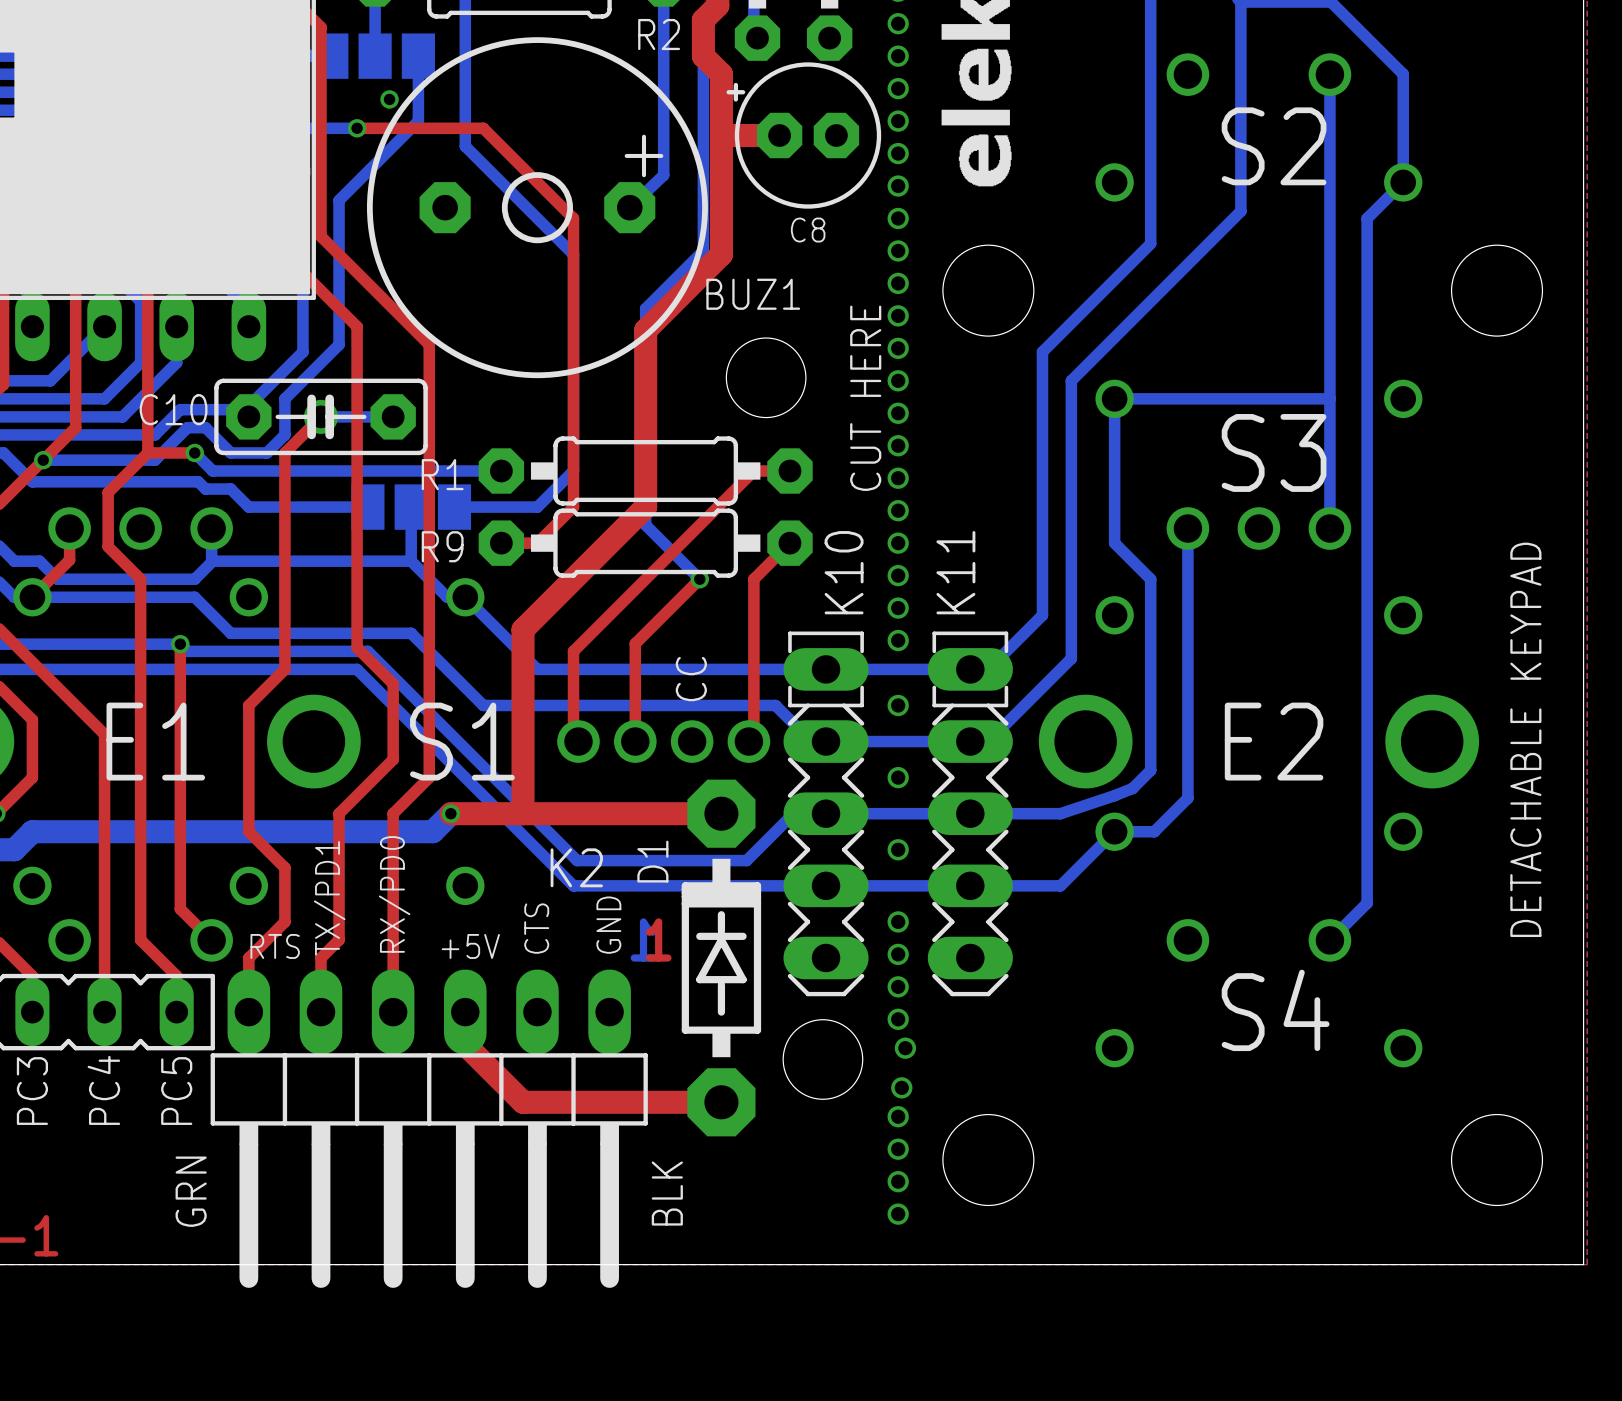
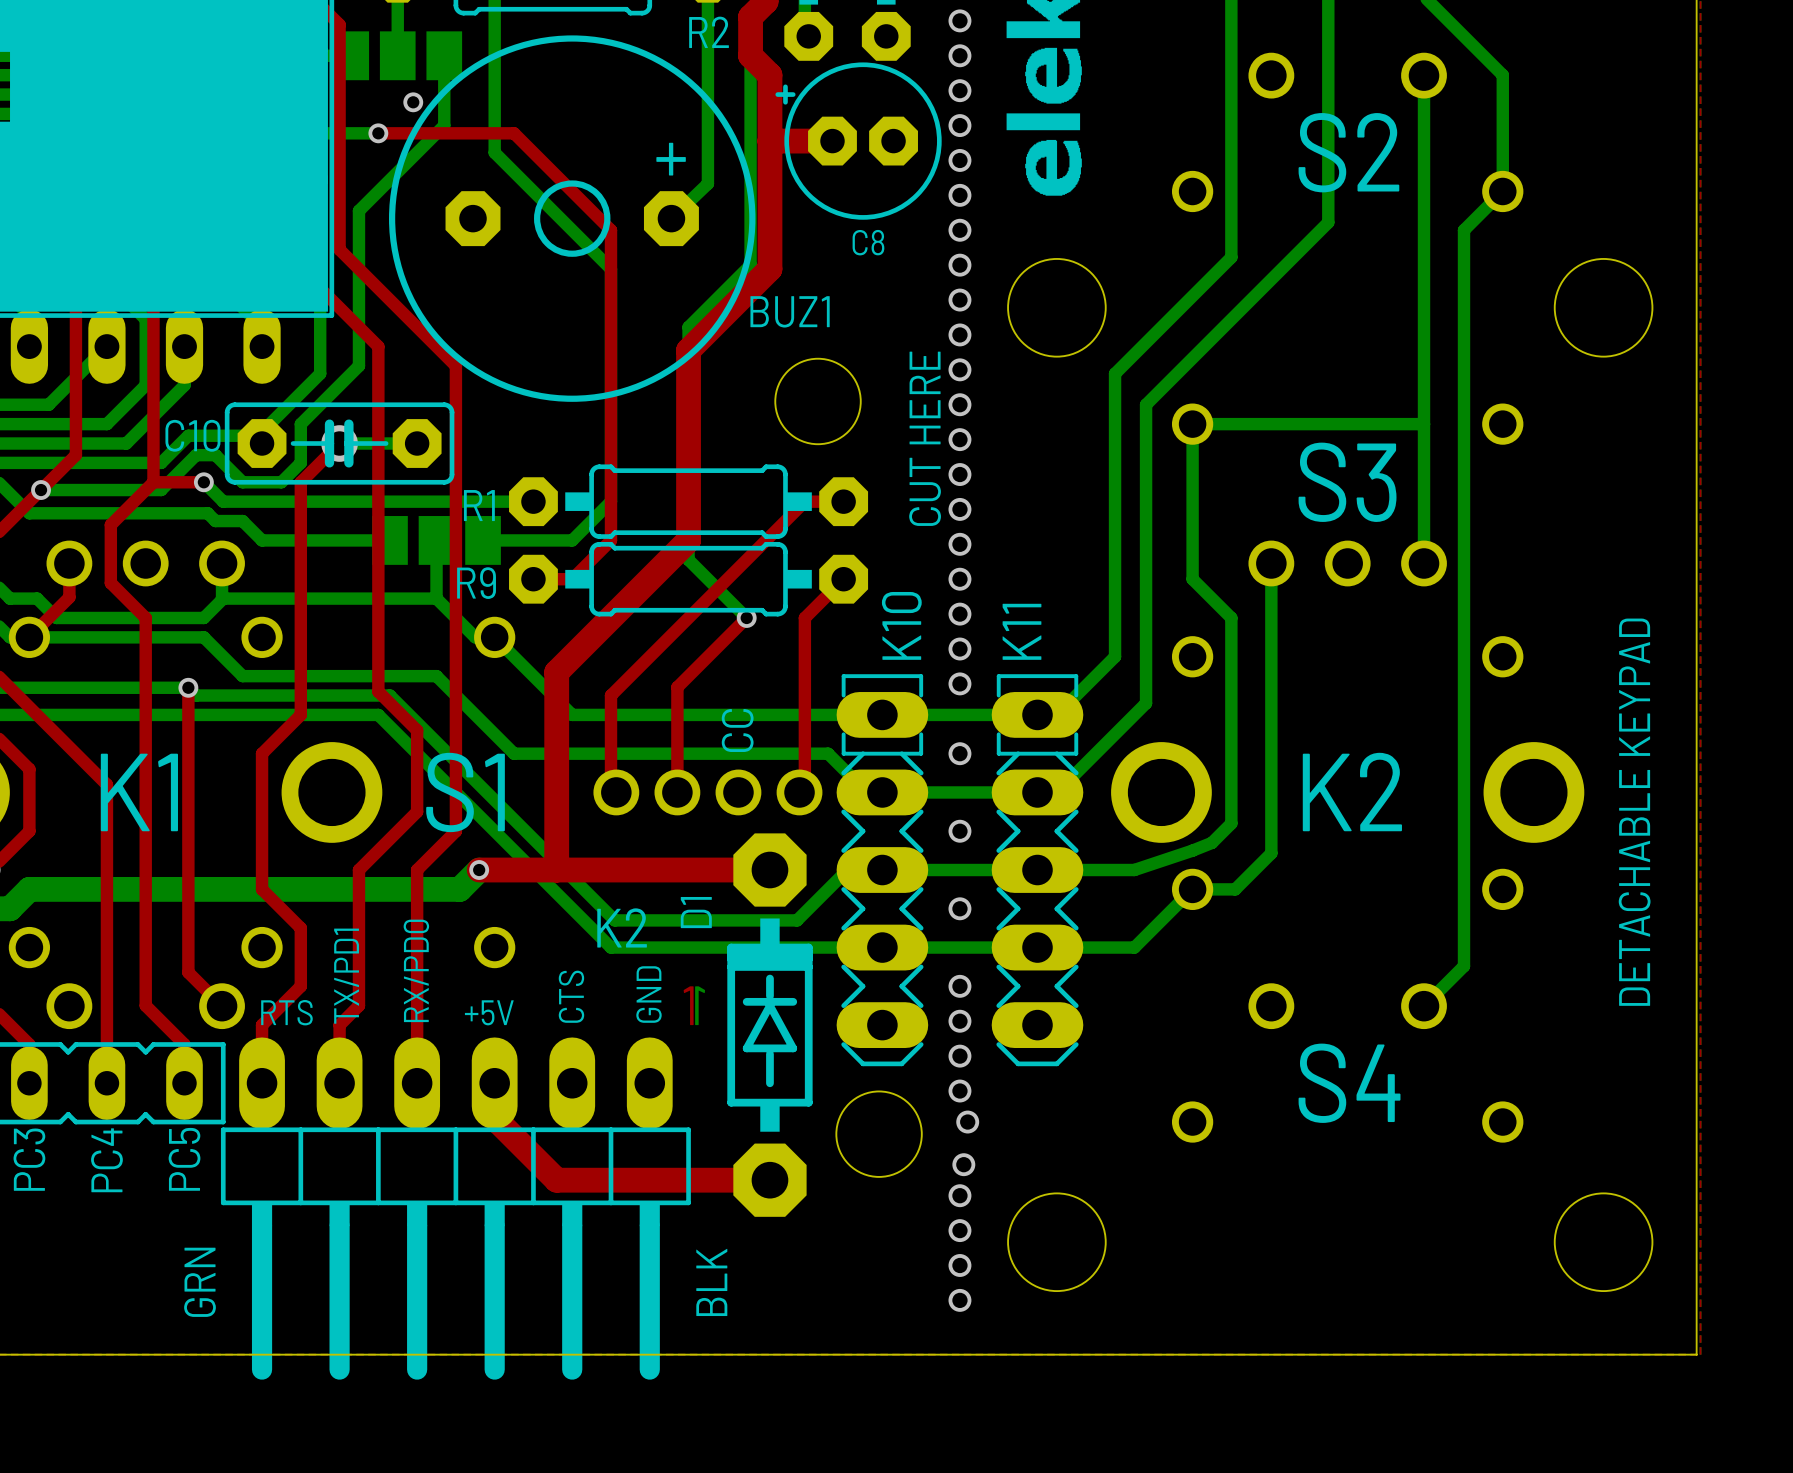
text: E1 (155, 741) -> K1 (139, 792)
text: E2 (1274, 741) -> K2 (1352, 792)

